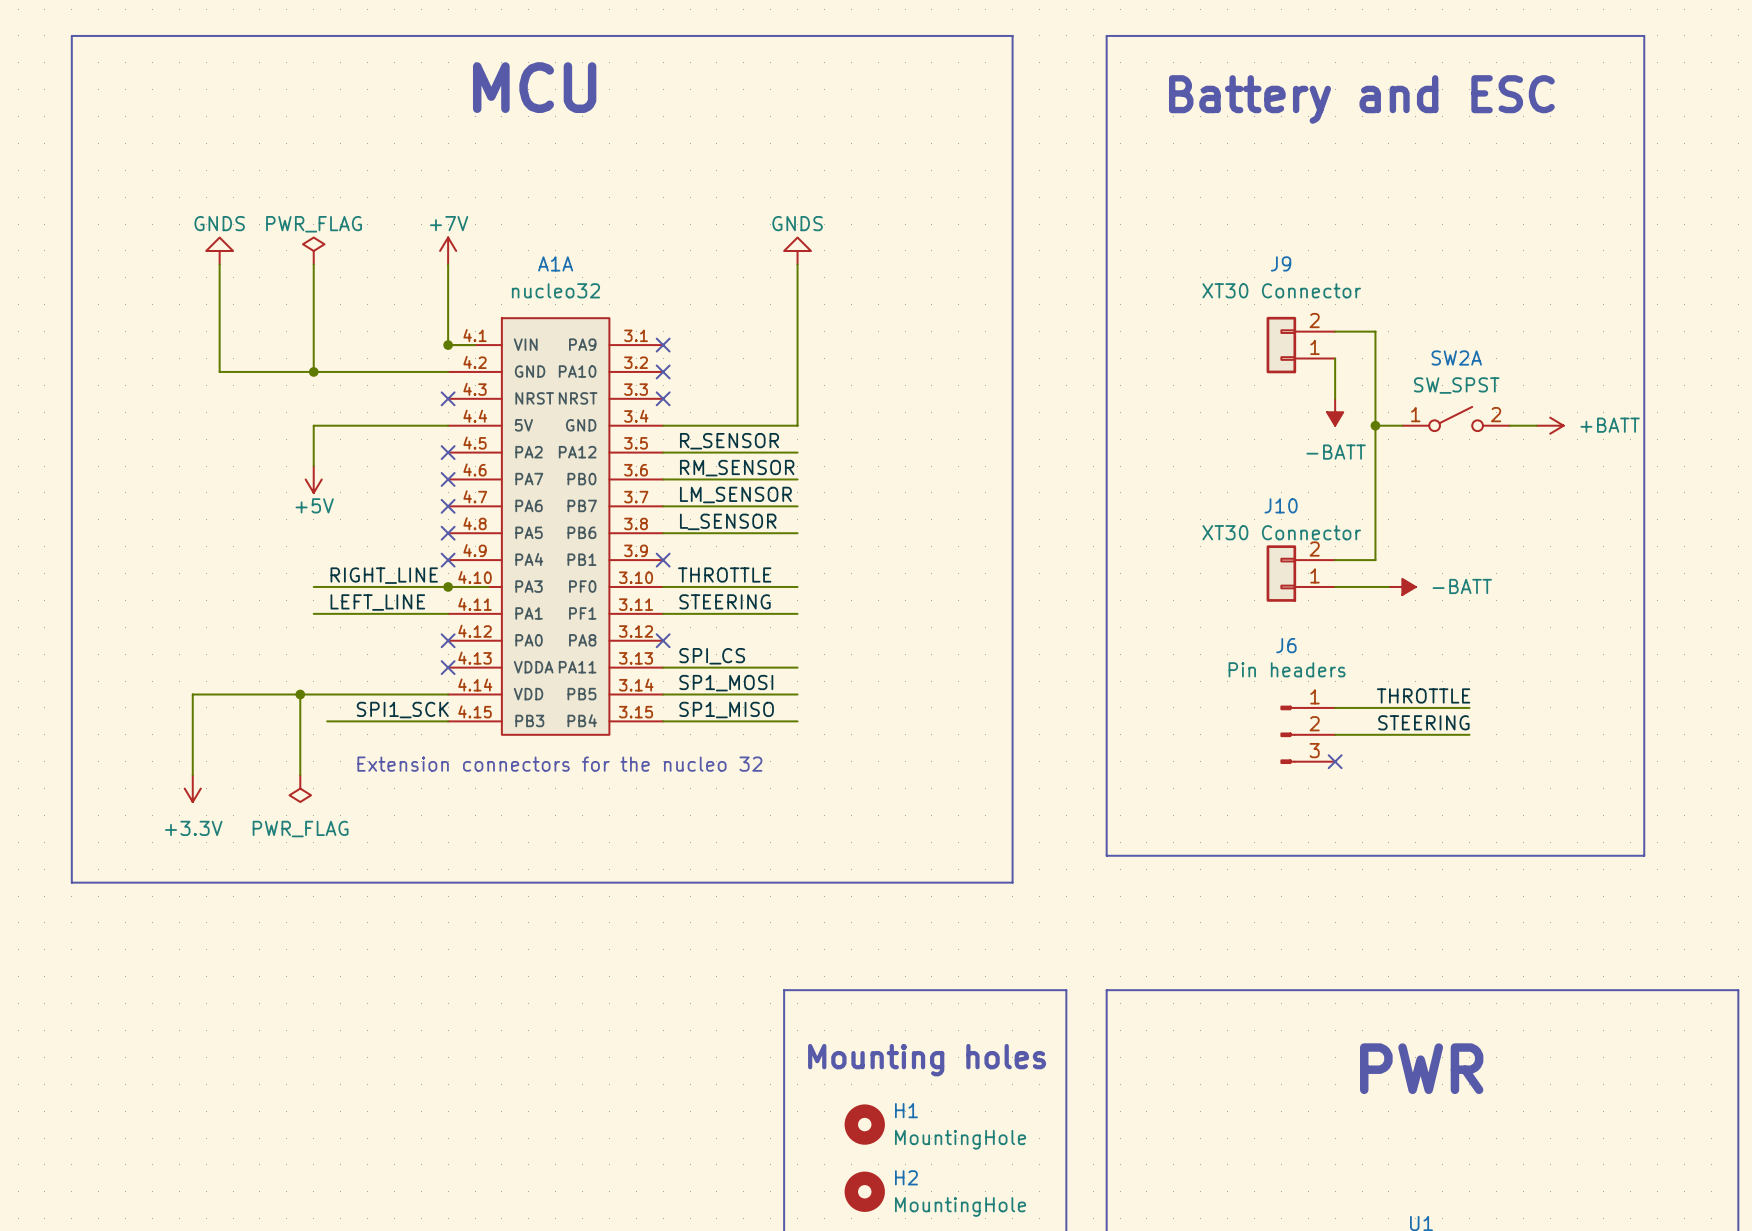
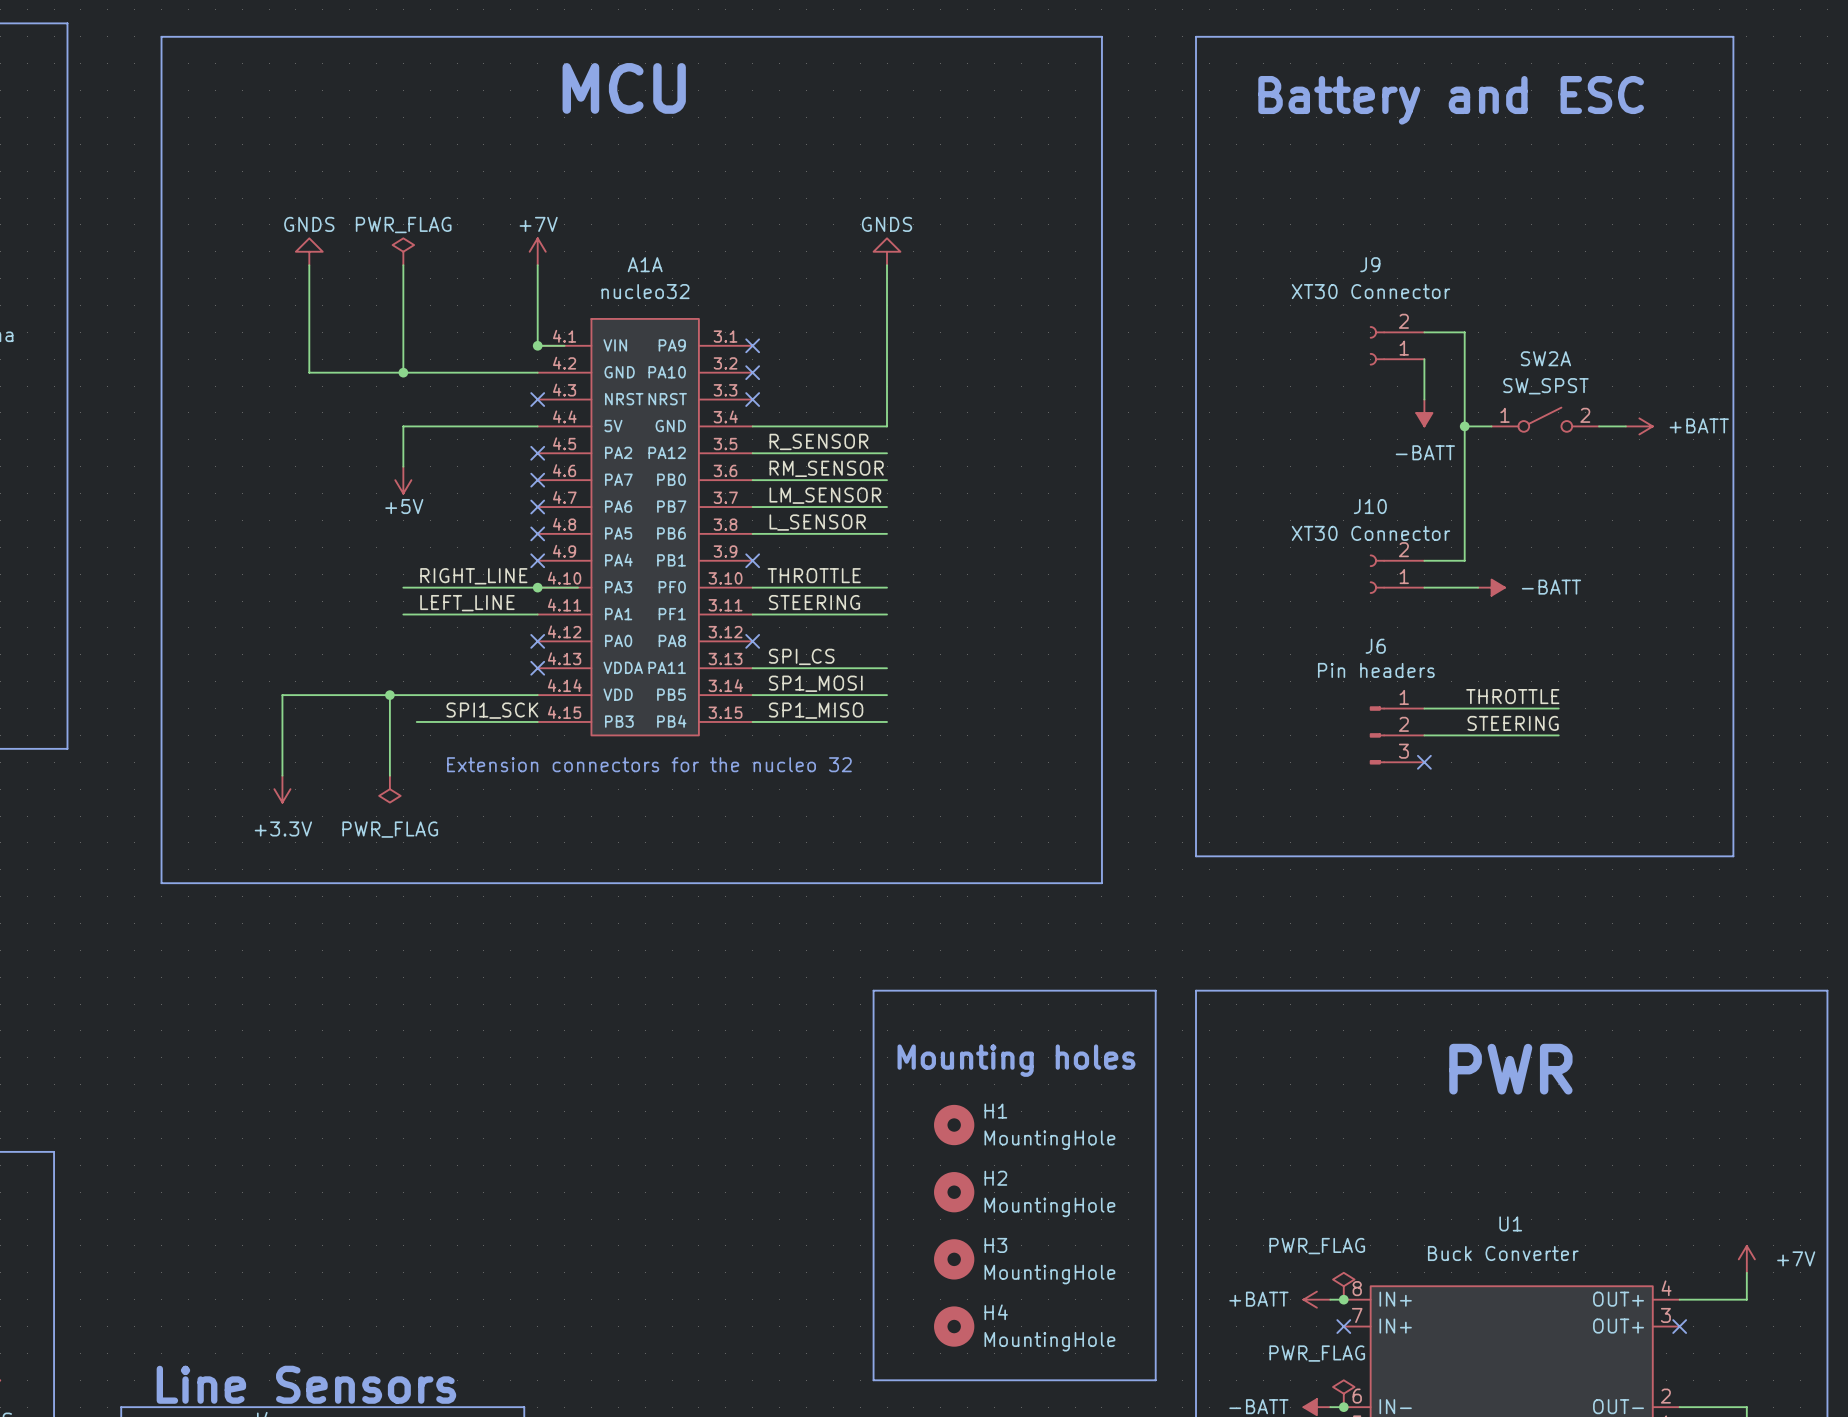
J9 symbol: [1266, 316, 1336, 374] -> [1369, 326, 1425, 366]
J10 symbol: [1266, 545, 1336, 602] -> [1369, 554, 1425, 594]

